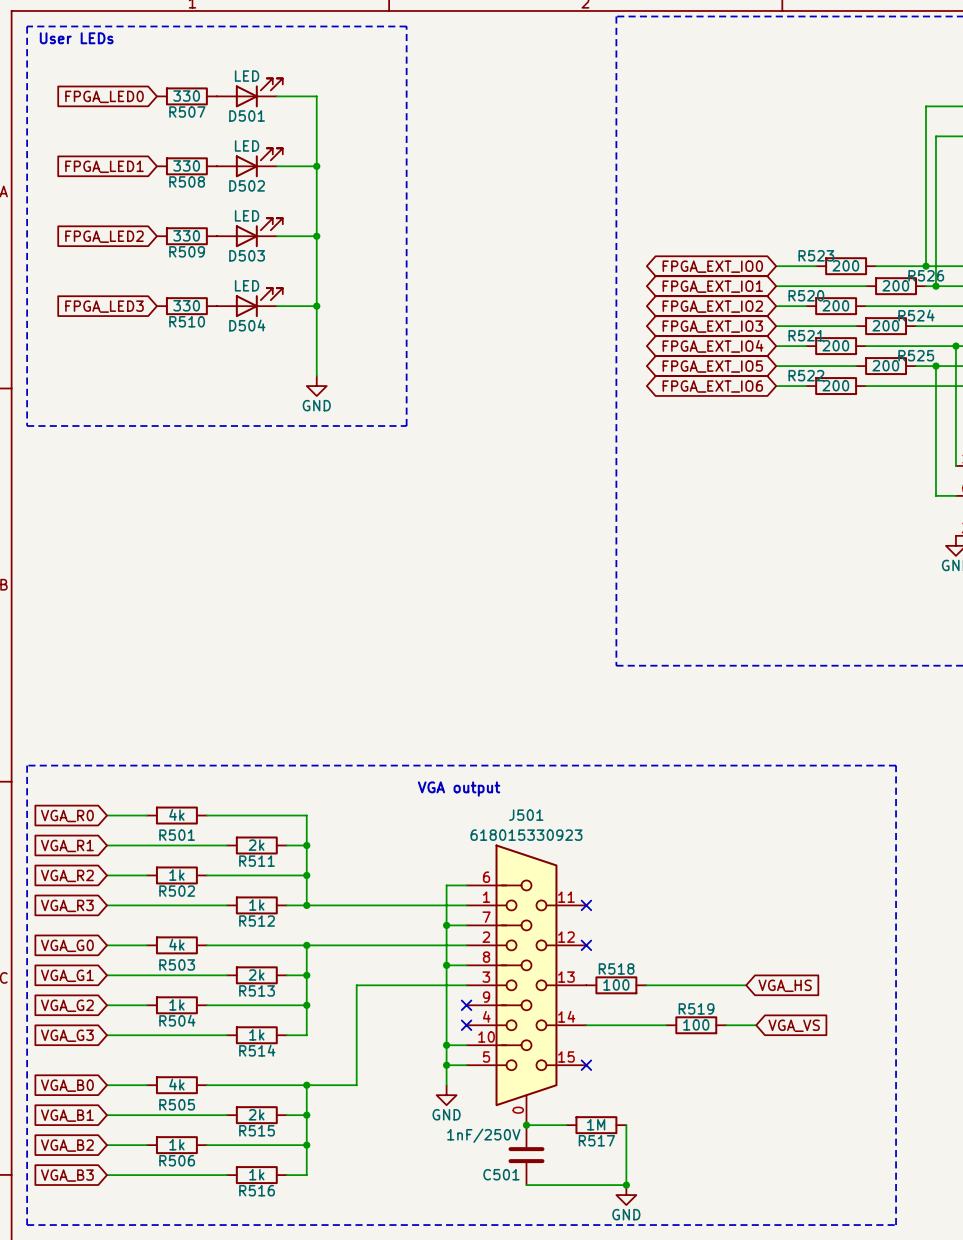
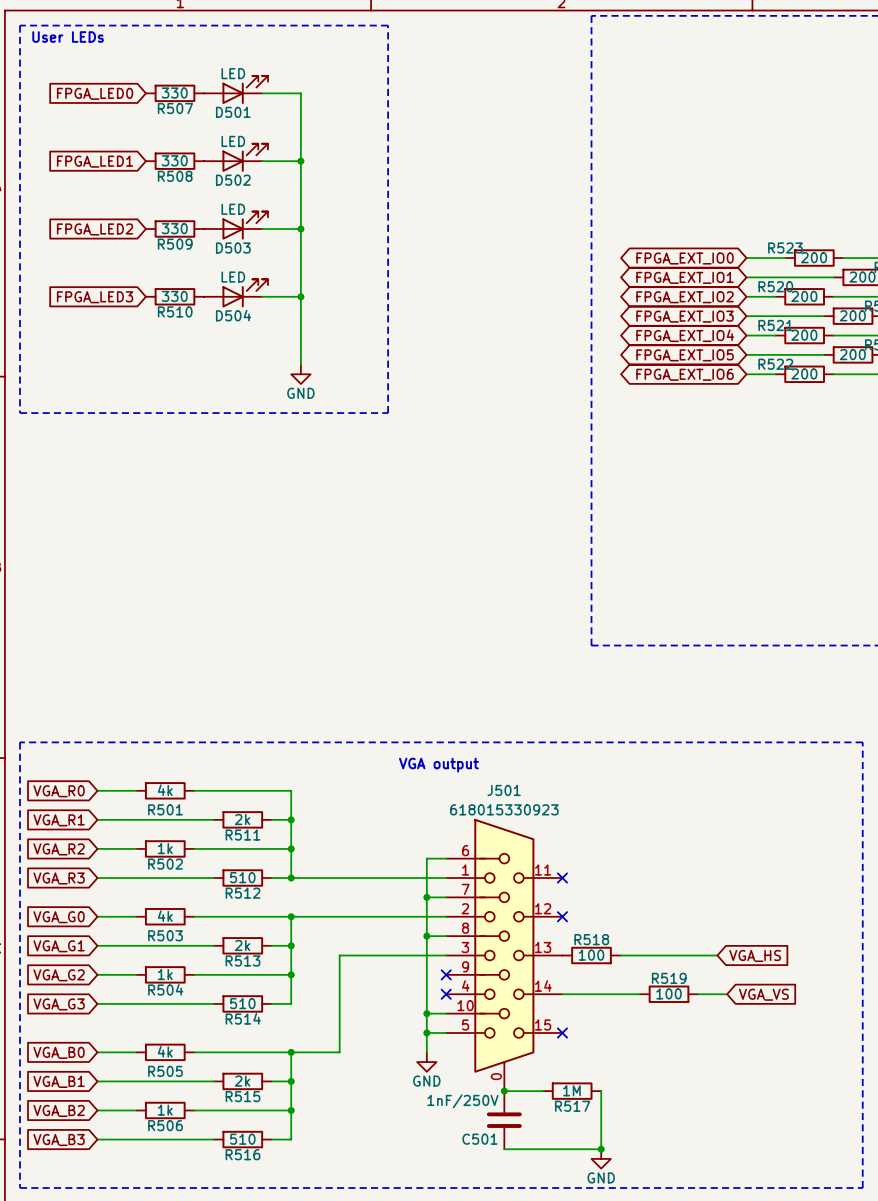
R512 value: 1k (256, 905) -> 510 (242, 877)
R514 value: 1k (256, 1034) -> 510 (242, 1003)
R516 value: 1k (256, 1174) -> 510 (242, 1139)

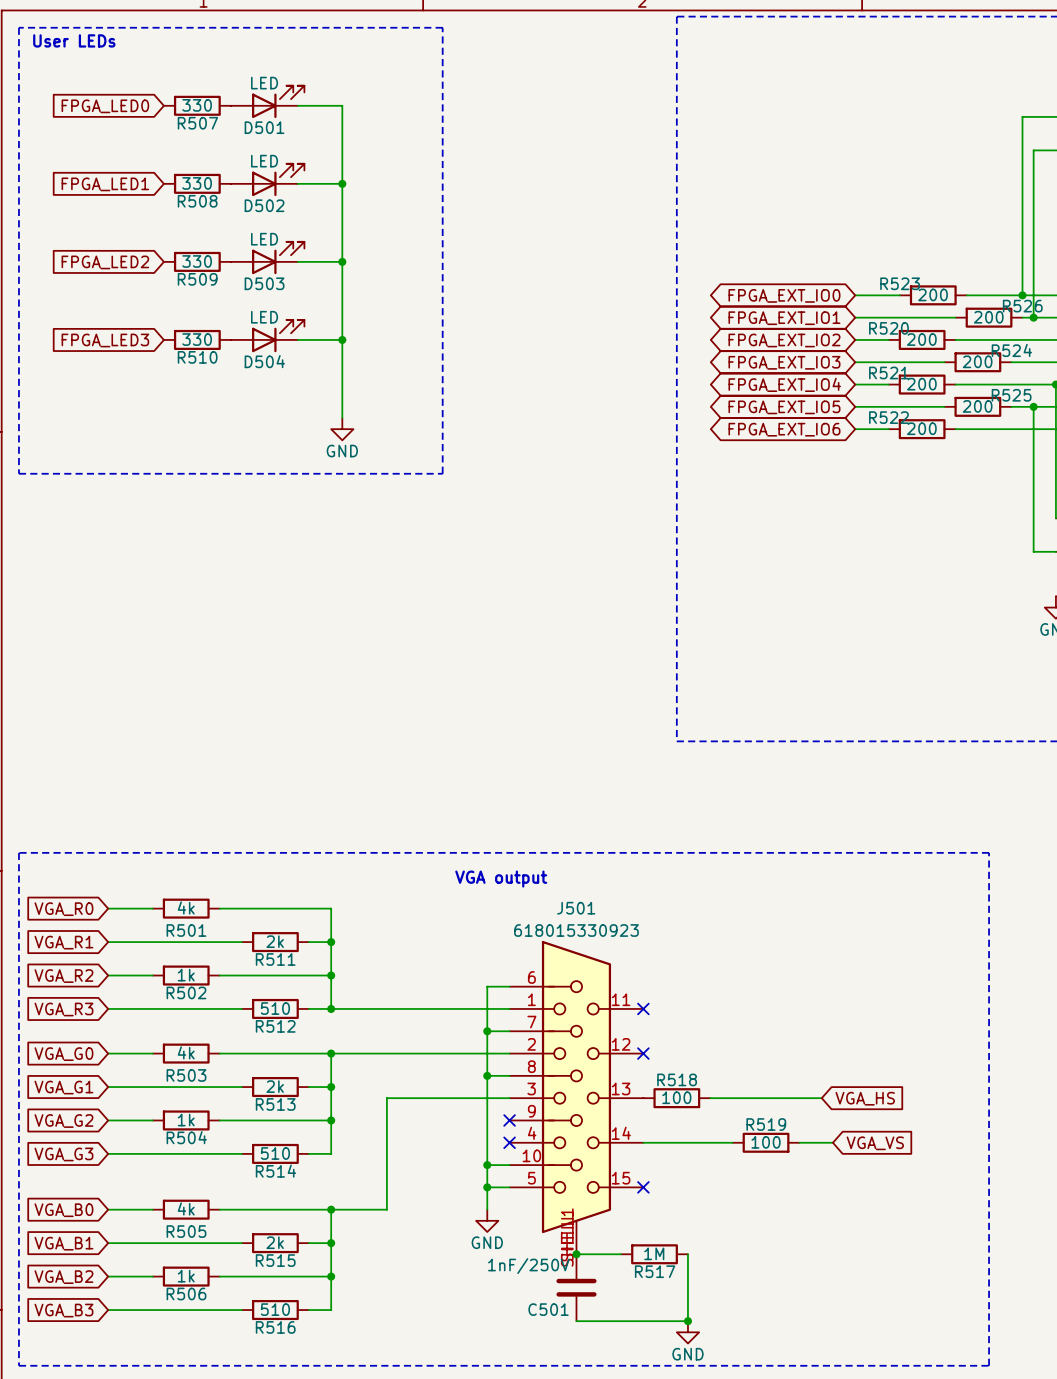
J501 symbol: [446, 818, 563, 1092] -> [509, 940, 644, 1255]

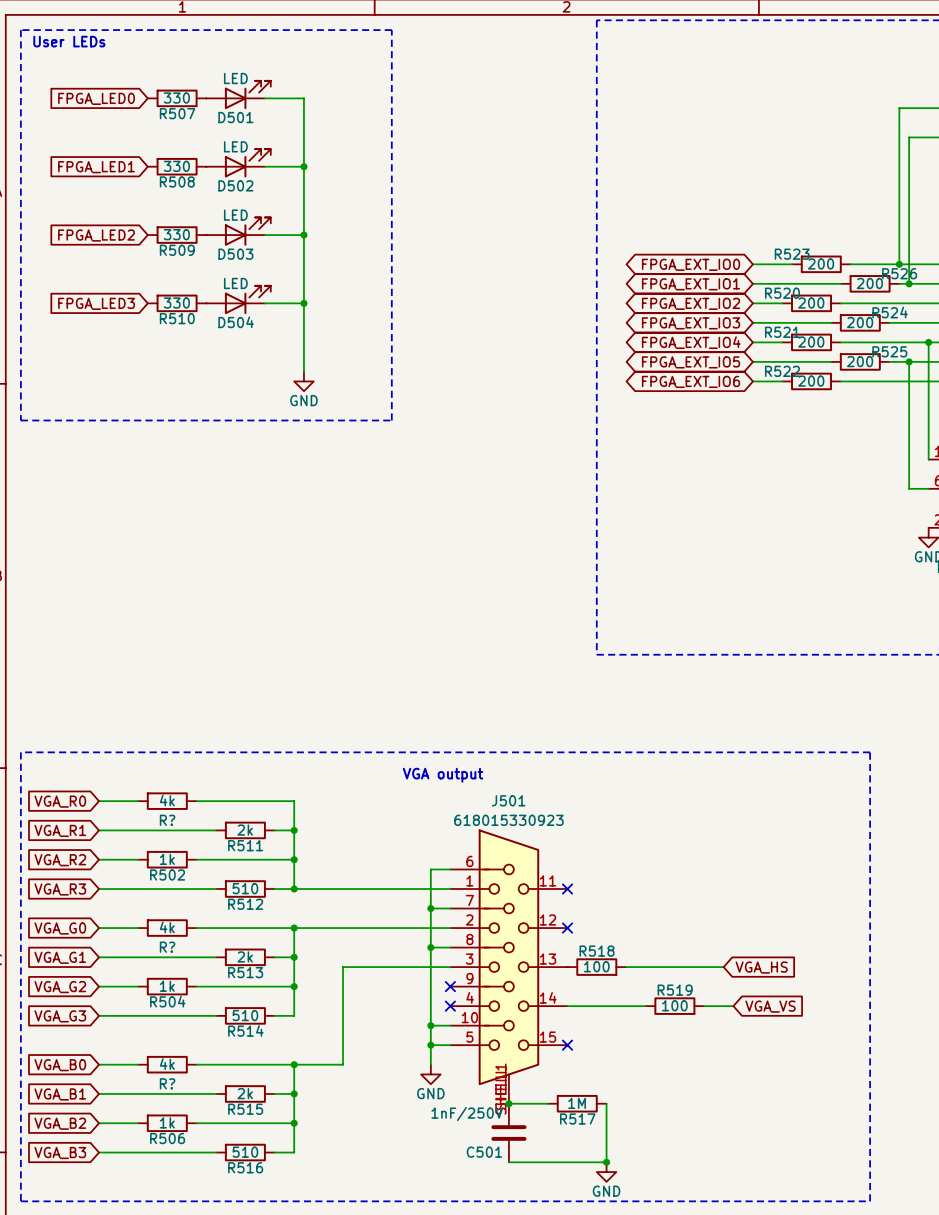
R501 name: R501 (186, 930) -> R? (167, 820)
R503 name: R503 (186, 1075) -> R? (167, 947)
R505 name: R505 (186, 1231) -> R? (167, 1083)

